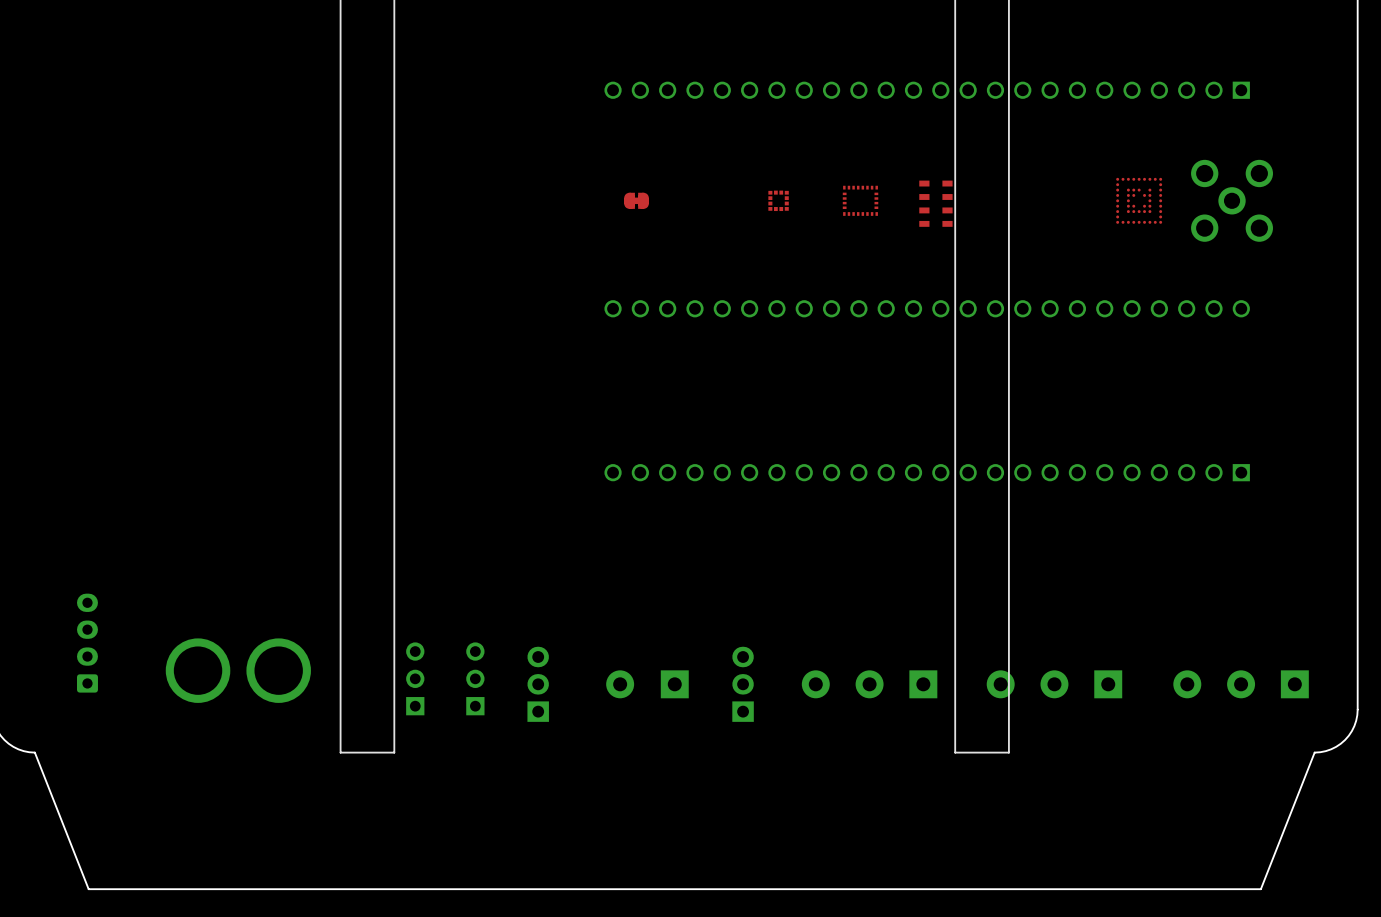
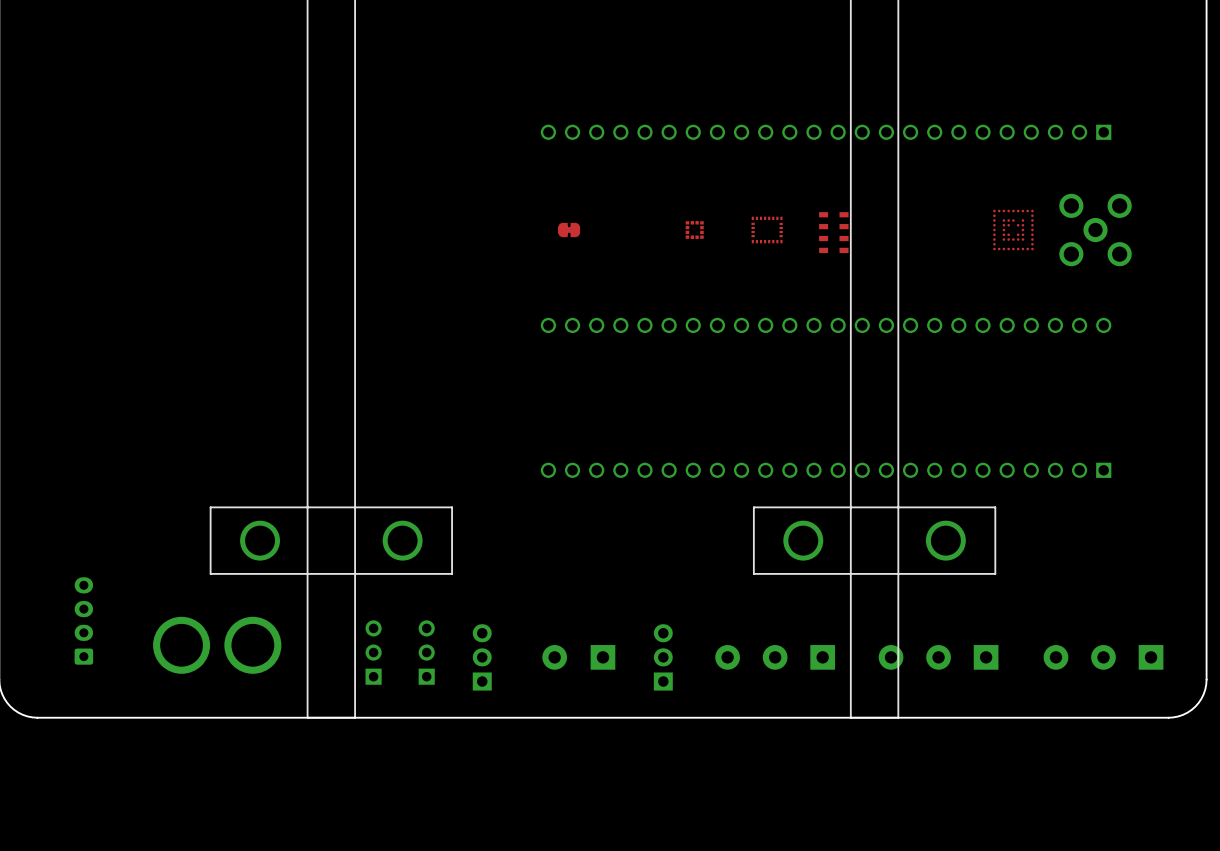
part: none -> (331, 540)
part: none -> (874, 540)
board edge: (1314, 752) (1260, 889) (88, 889) (34, 752) -> (1168, 717) (37, 717)

